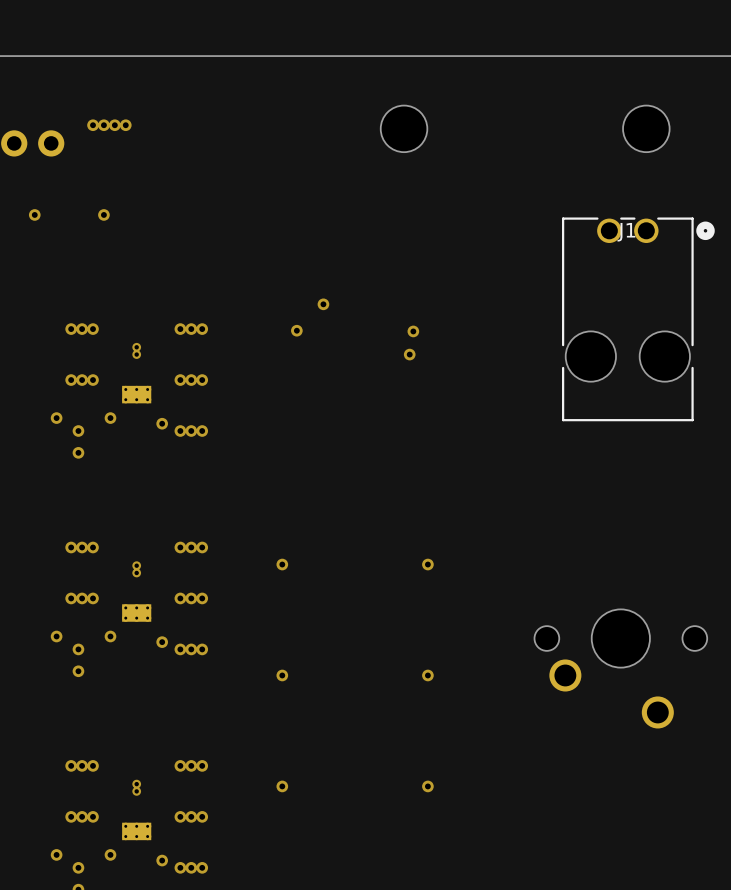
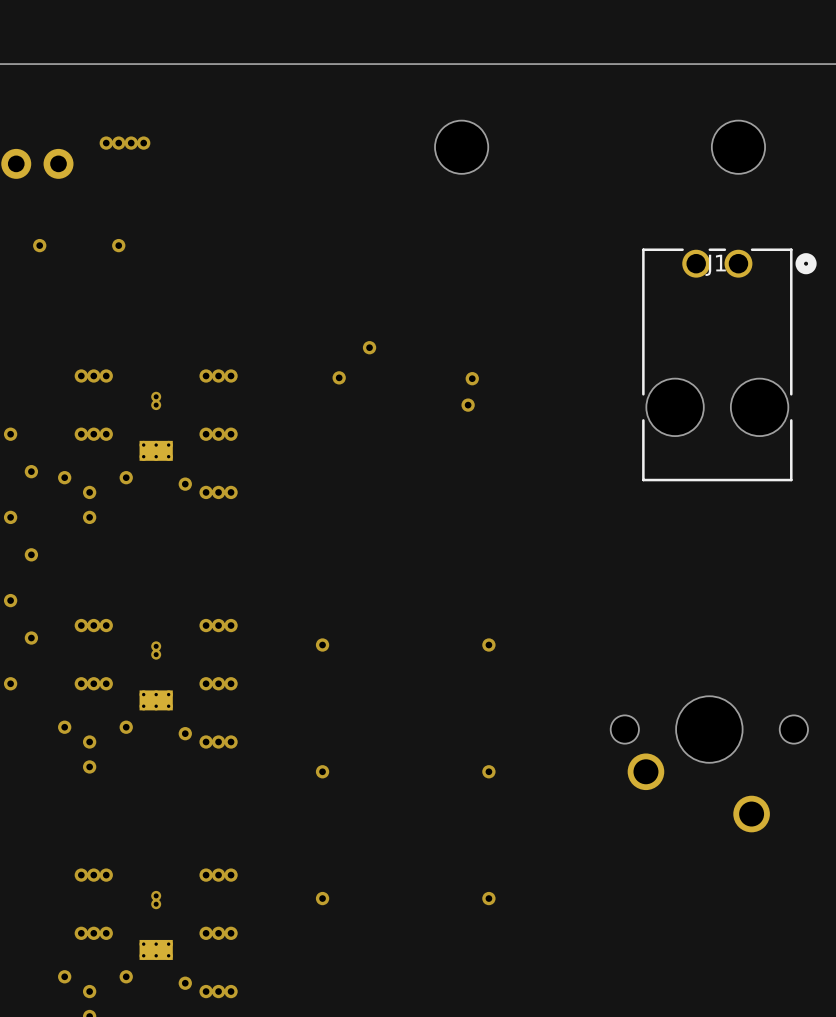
via: none -> (10, 434)
via: none -> (31, 471)
via: none -> (10, 517)
via: none -> (31, 554)
via: none -> (10, 600)
via: none -> (31, 638)
via: none -> (10, 683)

